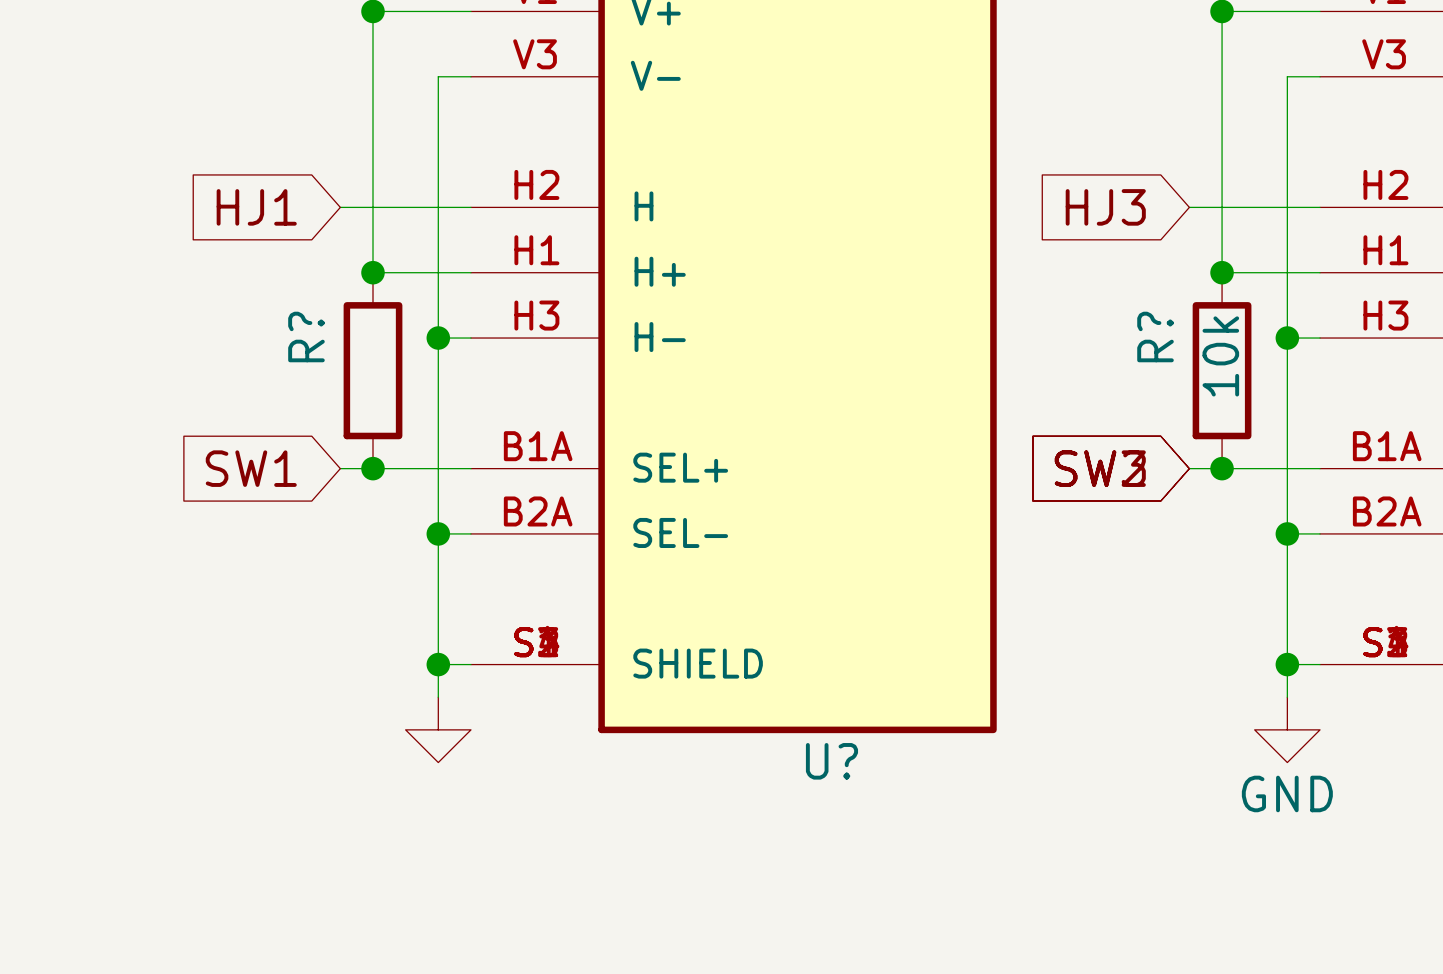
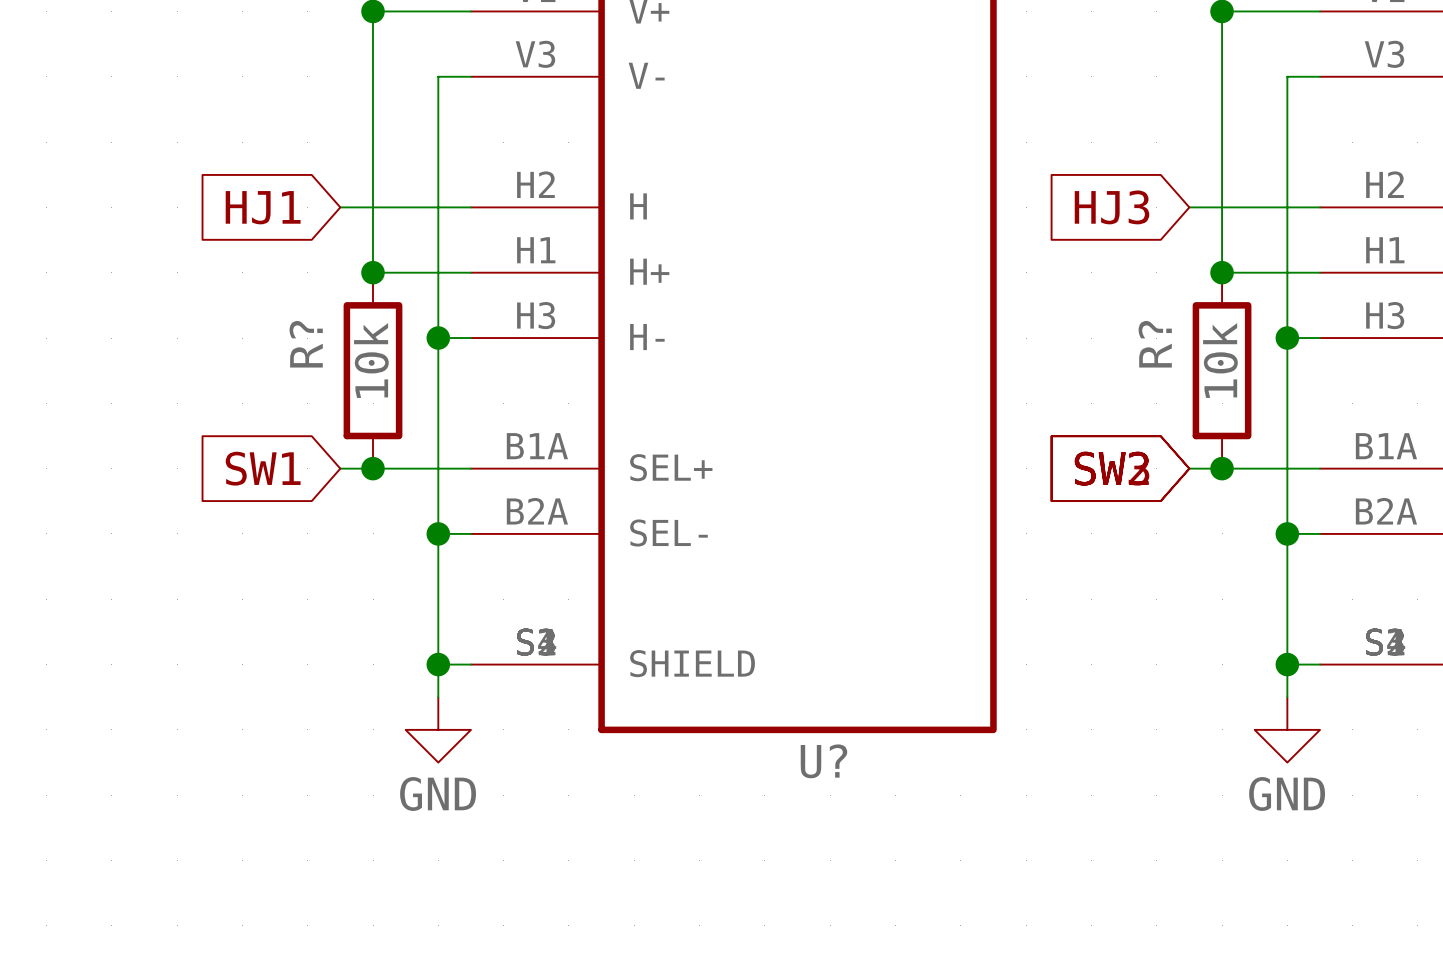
R? value: none -> 10k (371, 360)
power symbol text: none -> GND (438, 793)

